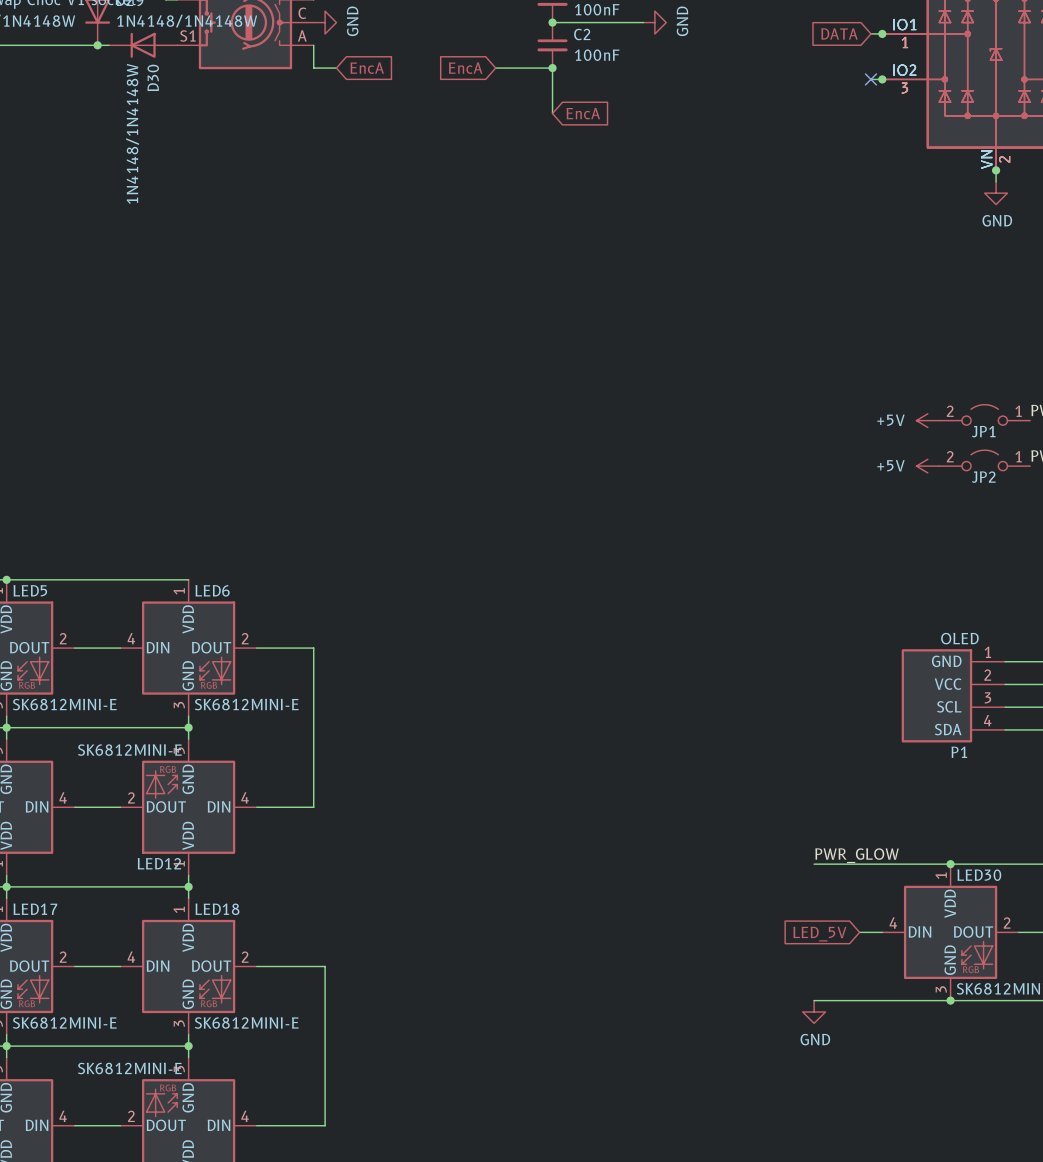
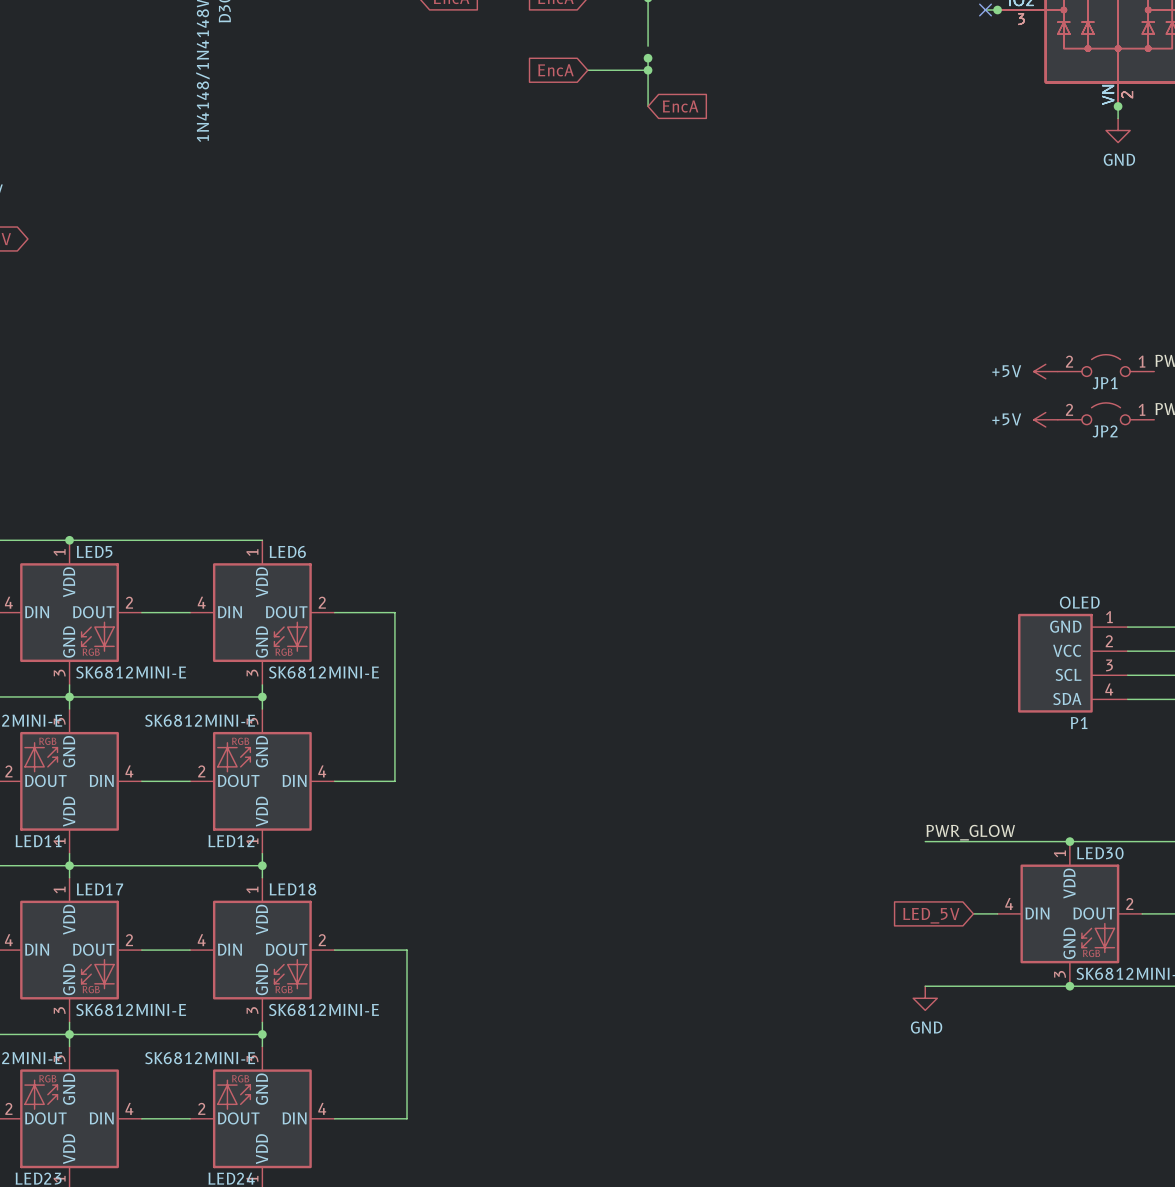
global label: EncA (583, 113) -> none
wire: none -> (648, 58) (648, 106)
junction: none -> (648, 58)
global label: none -> EncA (555, 70)
wire: none -> (587, 70) (648, 70)
junction: none -> (648, 70)
global label: none -> EncA (680, 106)

